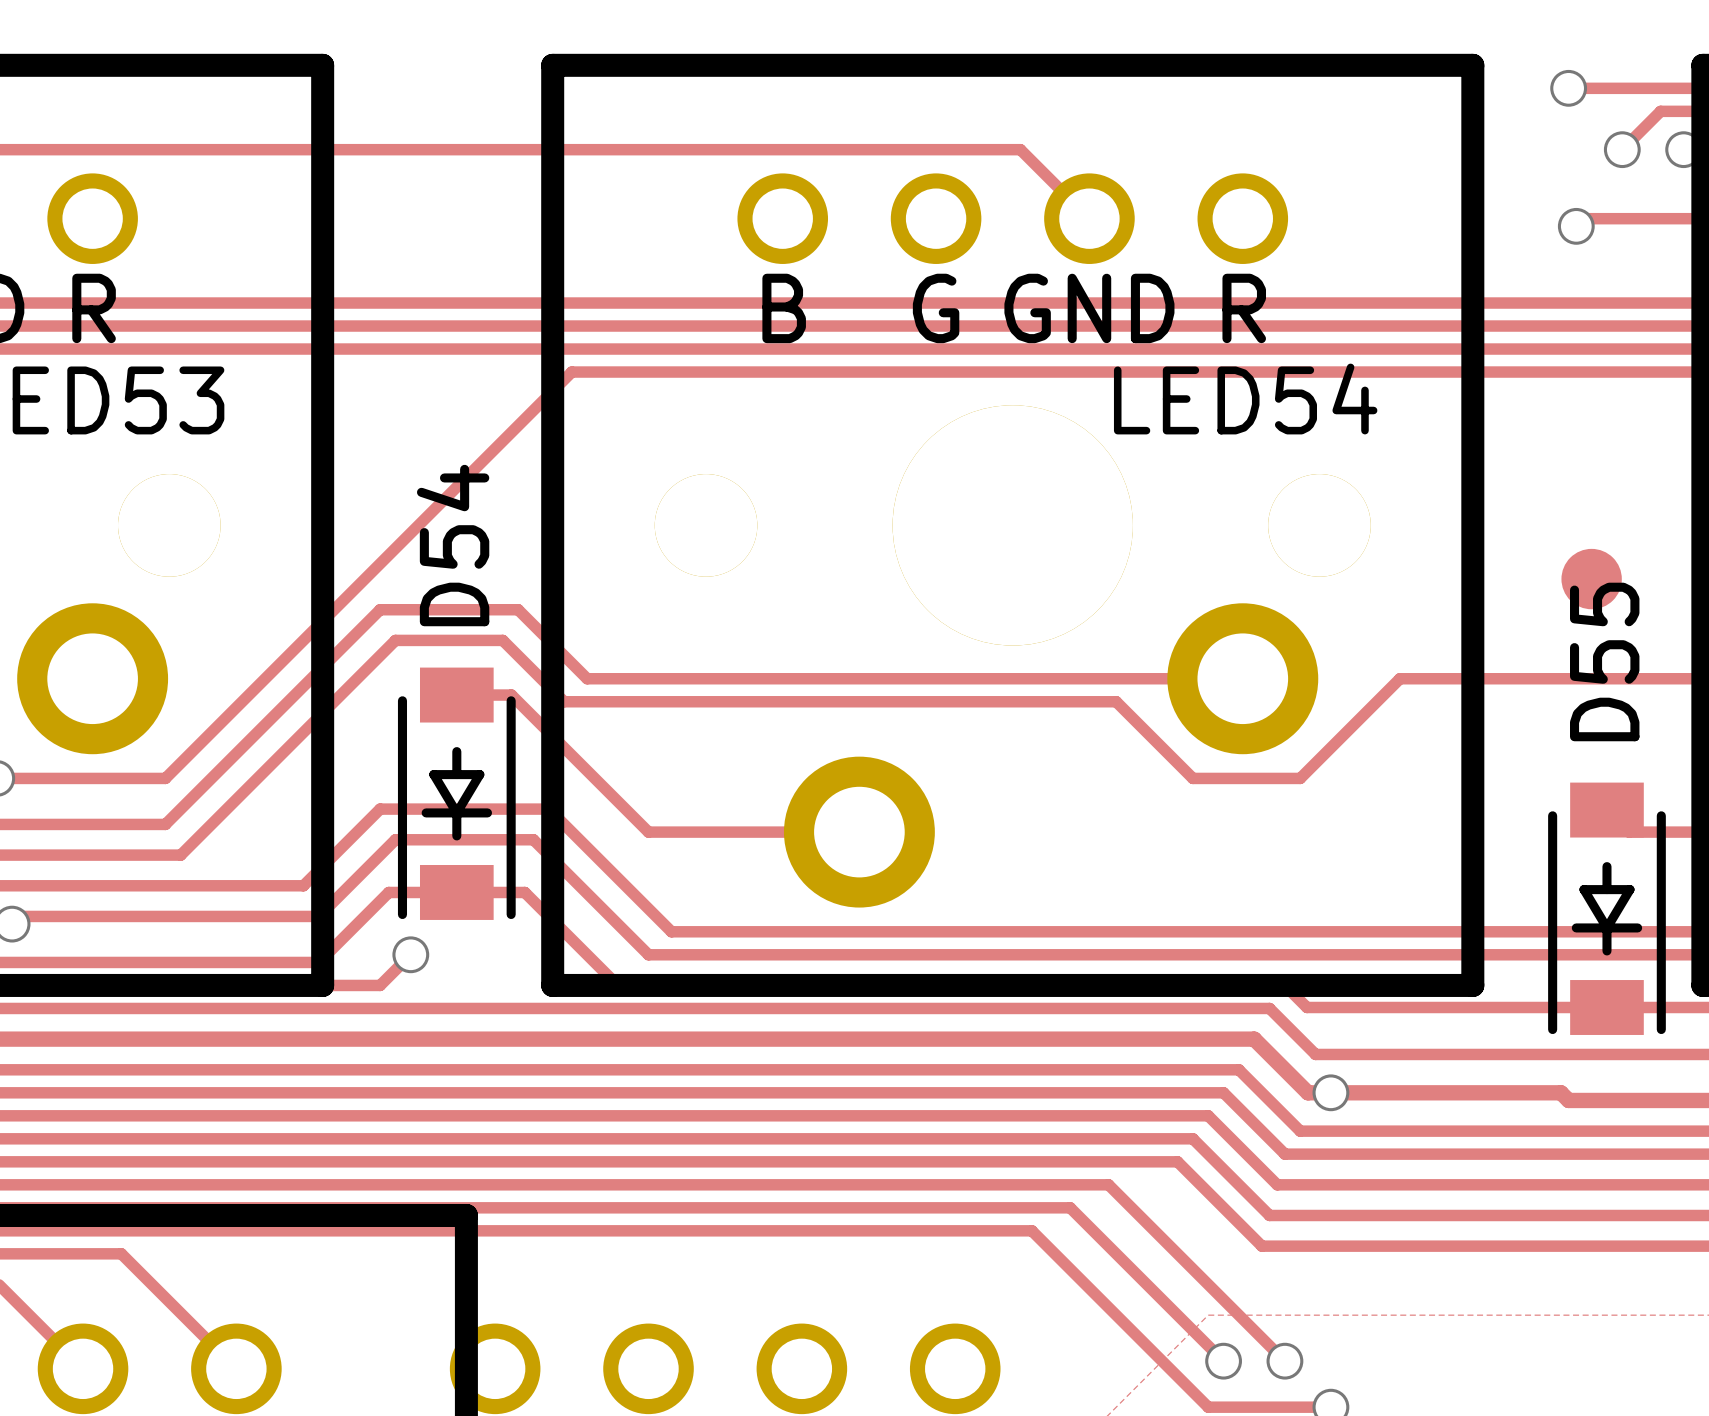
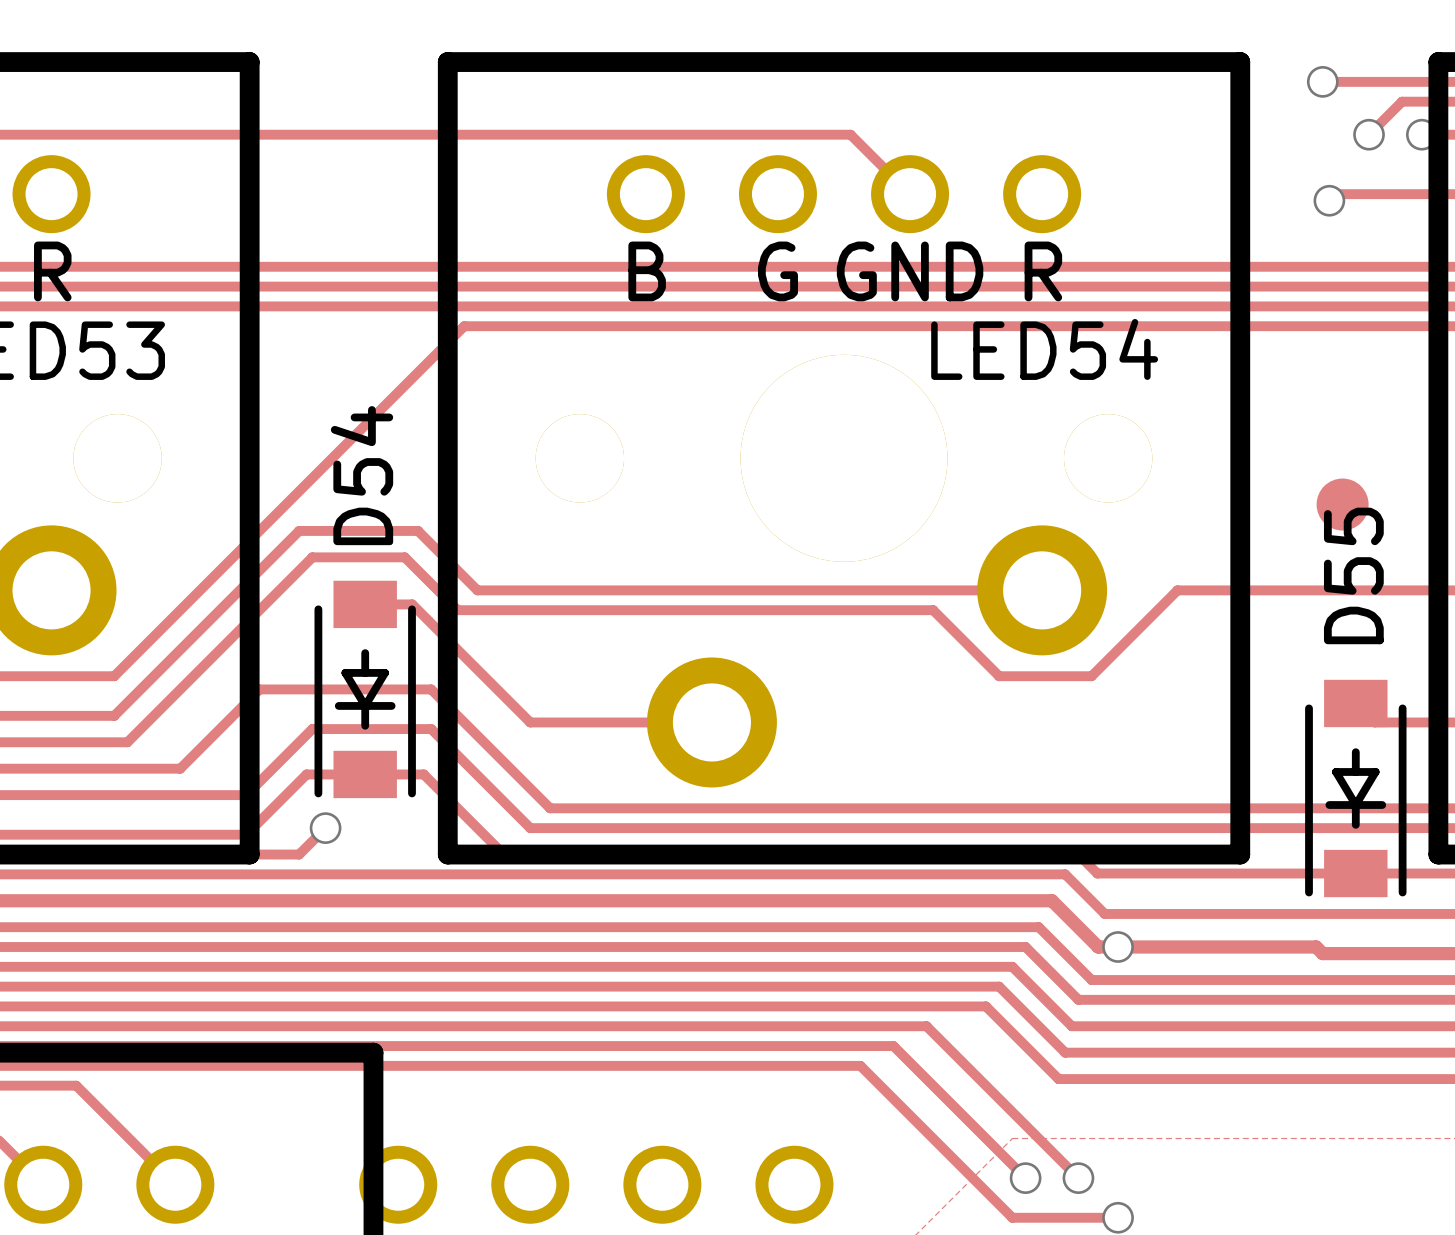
track: (548, 809) (380, 809) (303, 885) (242, 885) -> (444, 702) (431, 689) (259, 689) (180, 768)

